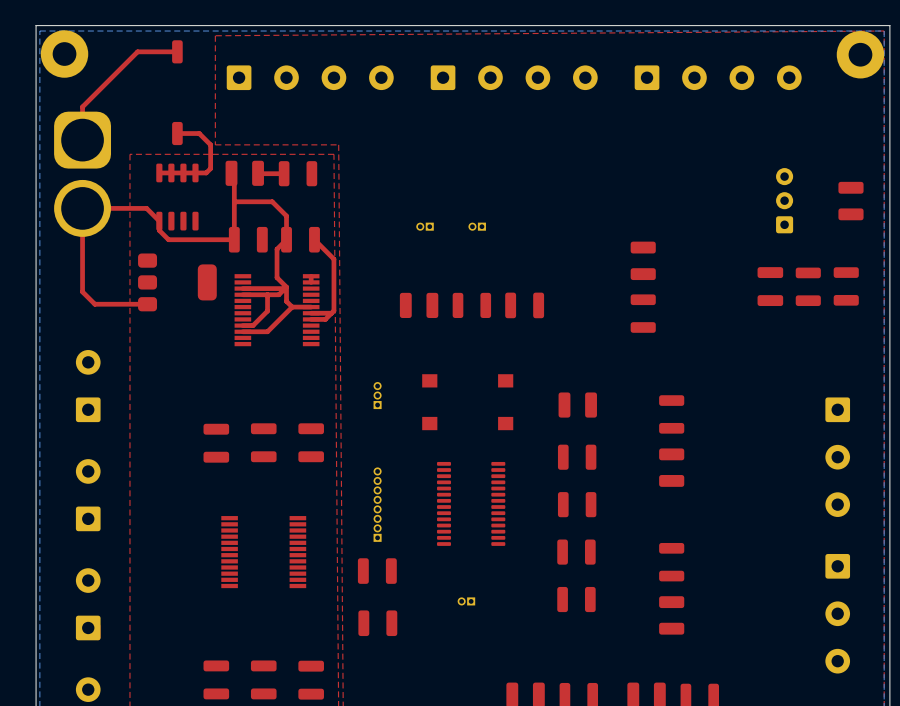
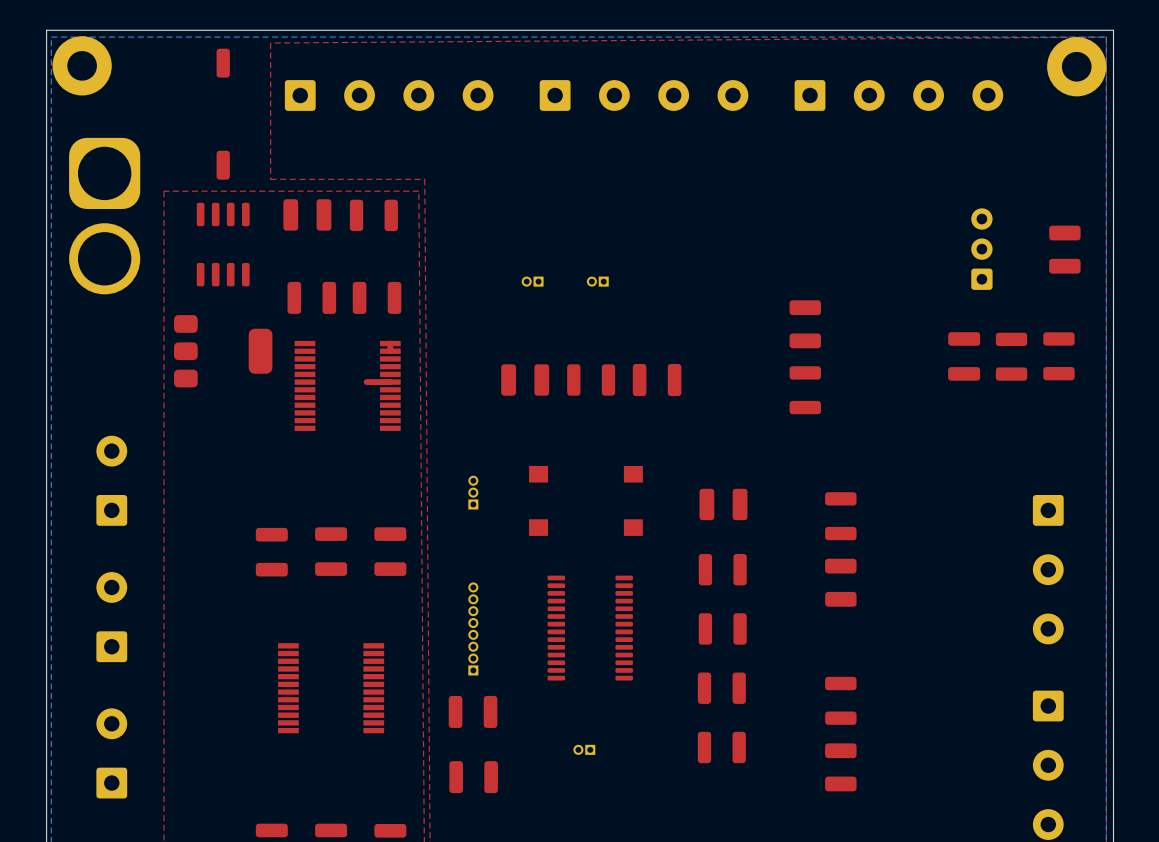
top track: (177, 51) (137, 51) (82, 106) (82, 140) -> none
top track: (177, 133) (199, 133) (210, 144) (210, 168) (206, 172) (159, 172) -> none
top track: (231, 173) (234, 176) (234, 239) (168, 239) (159, 230) (159, 221) (146, 208) (82, 208) (82, 291) (94, 304) (147, 304) -> none
top track: (258, 173) (284, 173) -> none
top track: (234, 201) (272, 201) (286, 216) (286, 239) (277, 249) (277, 277) (286, 287) -> none
top track: (314, 239) (333, 259) (333, 310) (325, 319) (311, 319) -> none
top track: (286, 287) (278, 294) (242, 294) -> none
top track: (286, 287) (286, 301) (292, 307) (267, 331) (242, 331) -> none
top track: (285, 288) (242, 288) -> none
top track: (267, 294) (267, 311) (253, 325) (242, 325) -> none
top track: (331, 313) (311, 313) -> none

